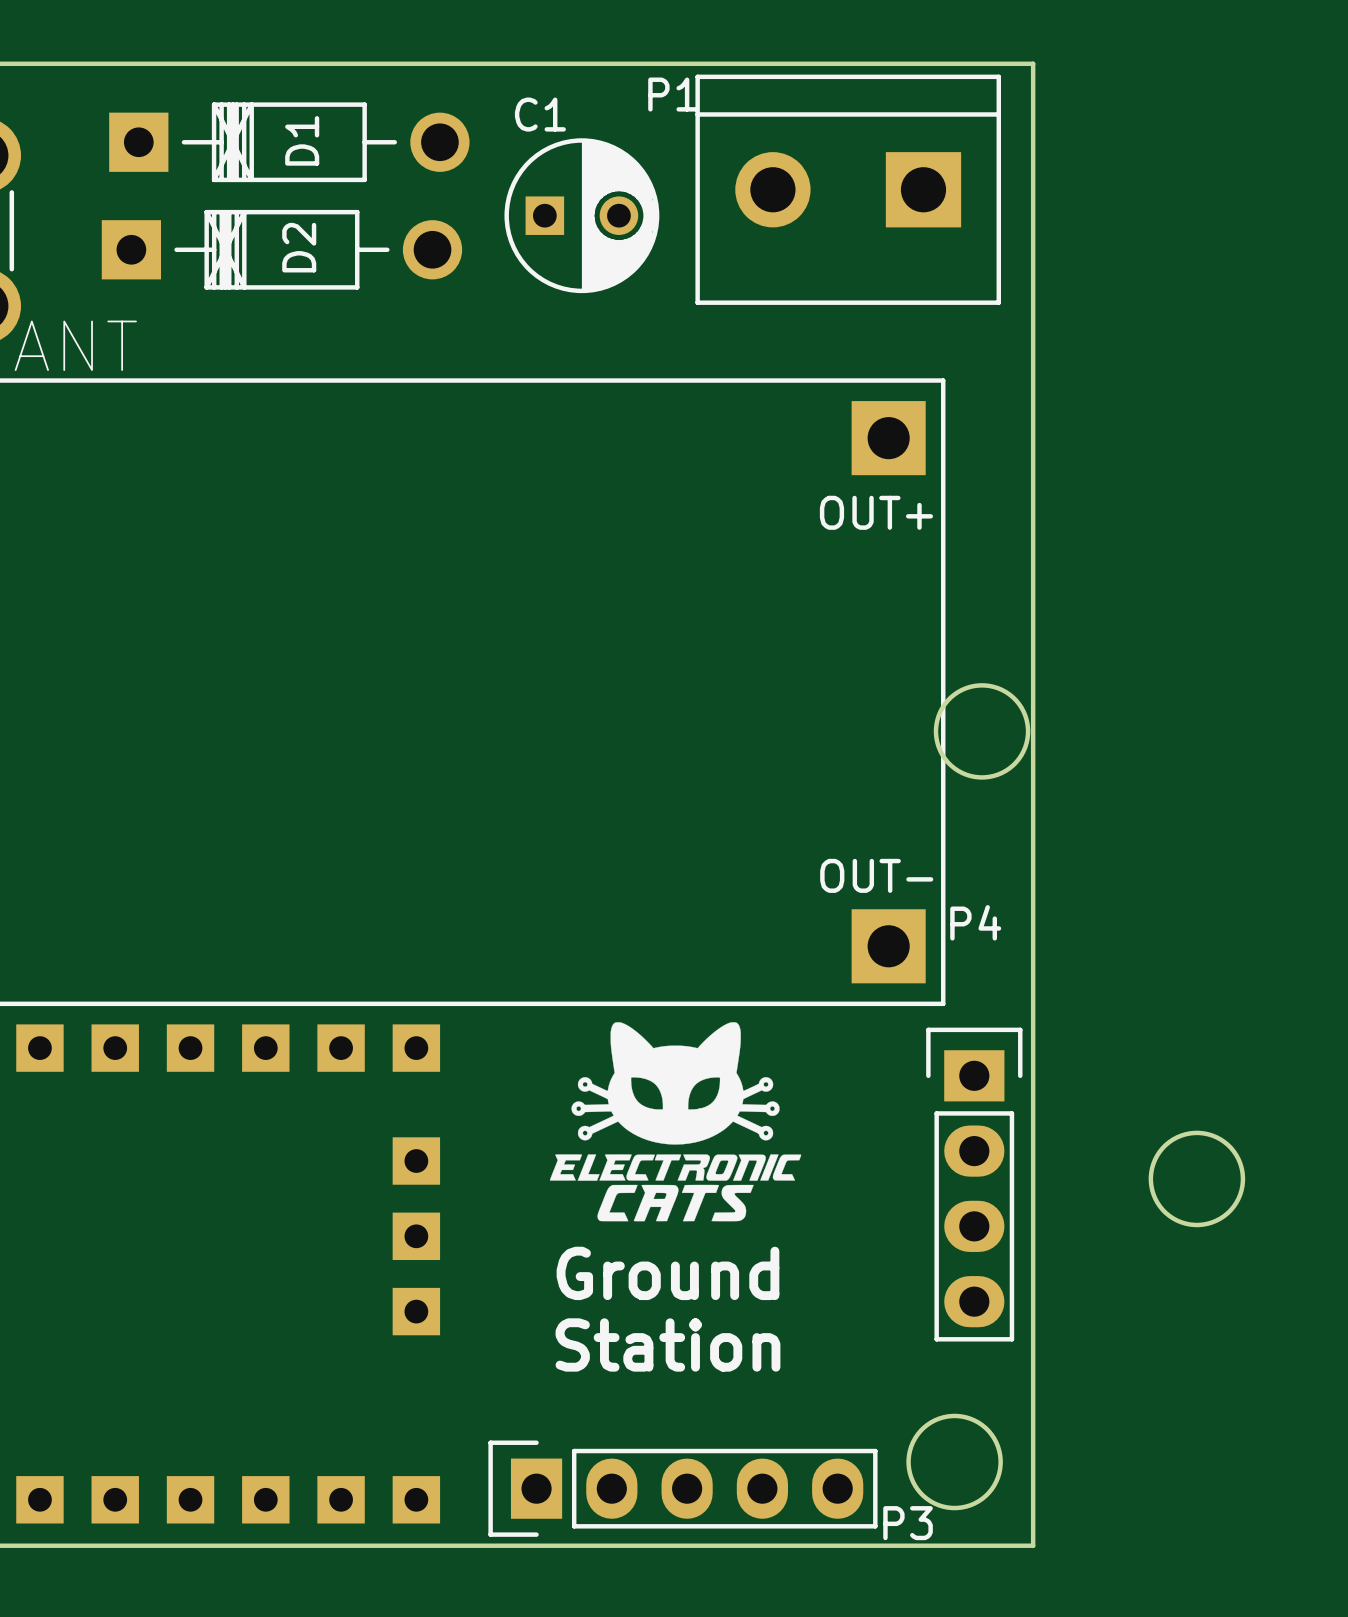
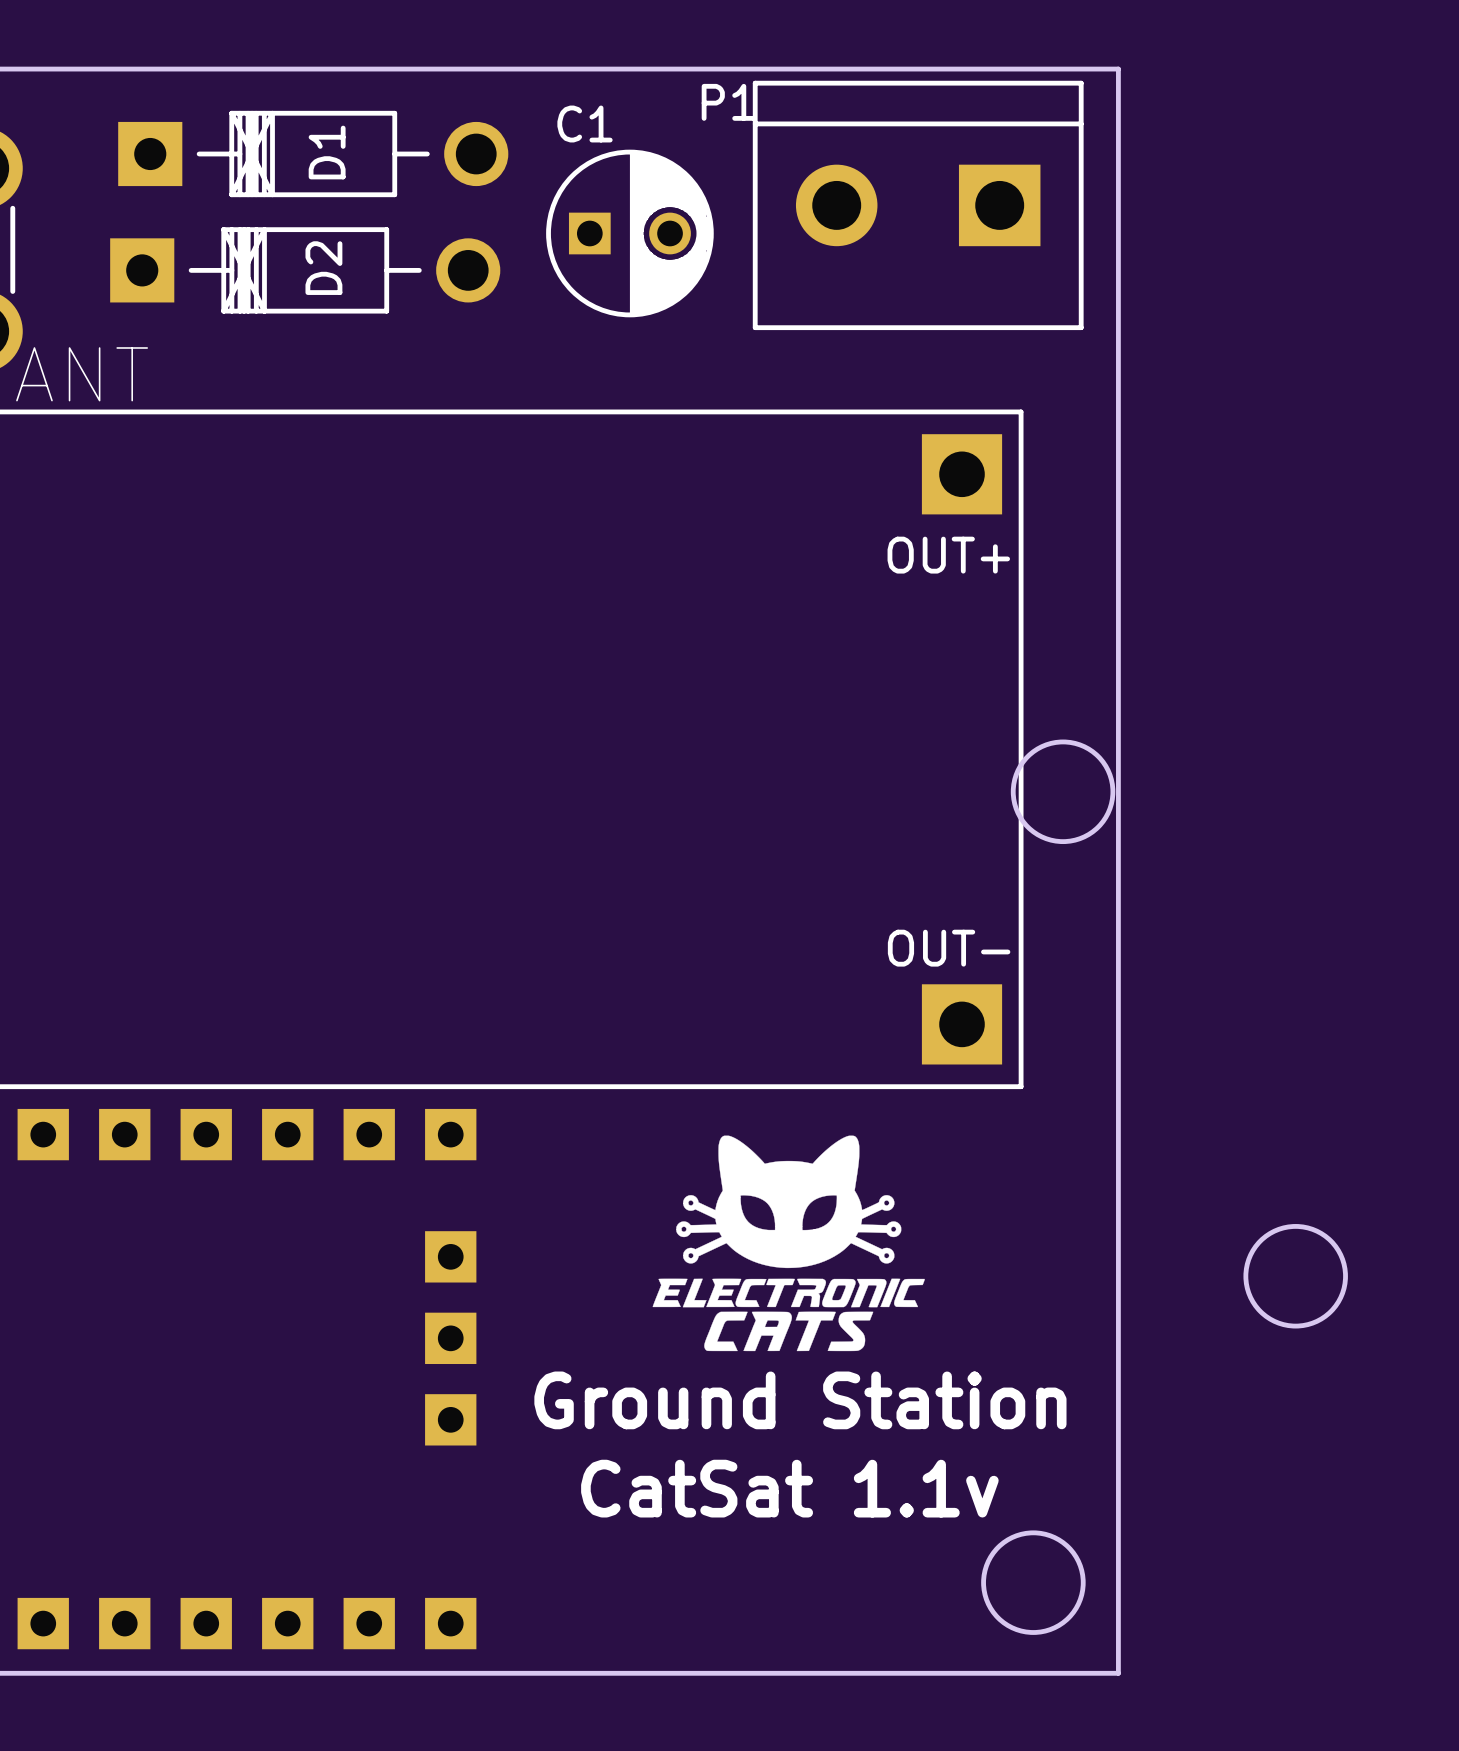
drawing position: (675, 1121) -> (788, 1243)
P4: (974, 1184) -> none
text: Ground (667, 1273) -> none
text: Station (667, 1344) -> Ground Station (800, 1400)
text: none -> CatSat 1.1v (789, 1488)
P3: (682, 1488) -> none

